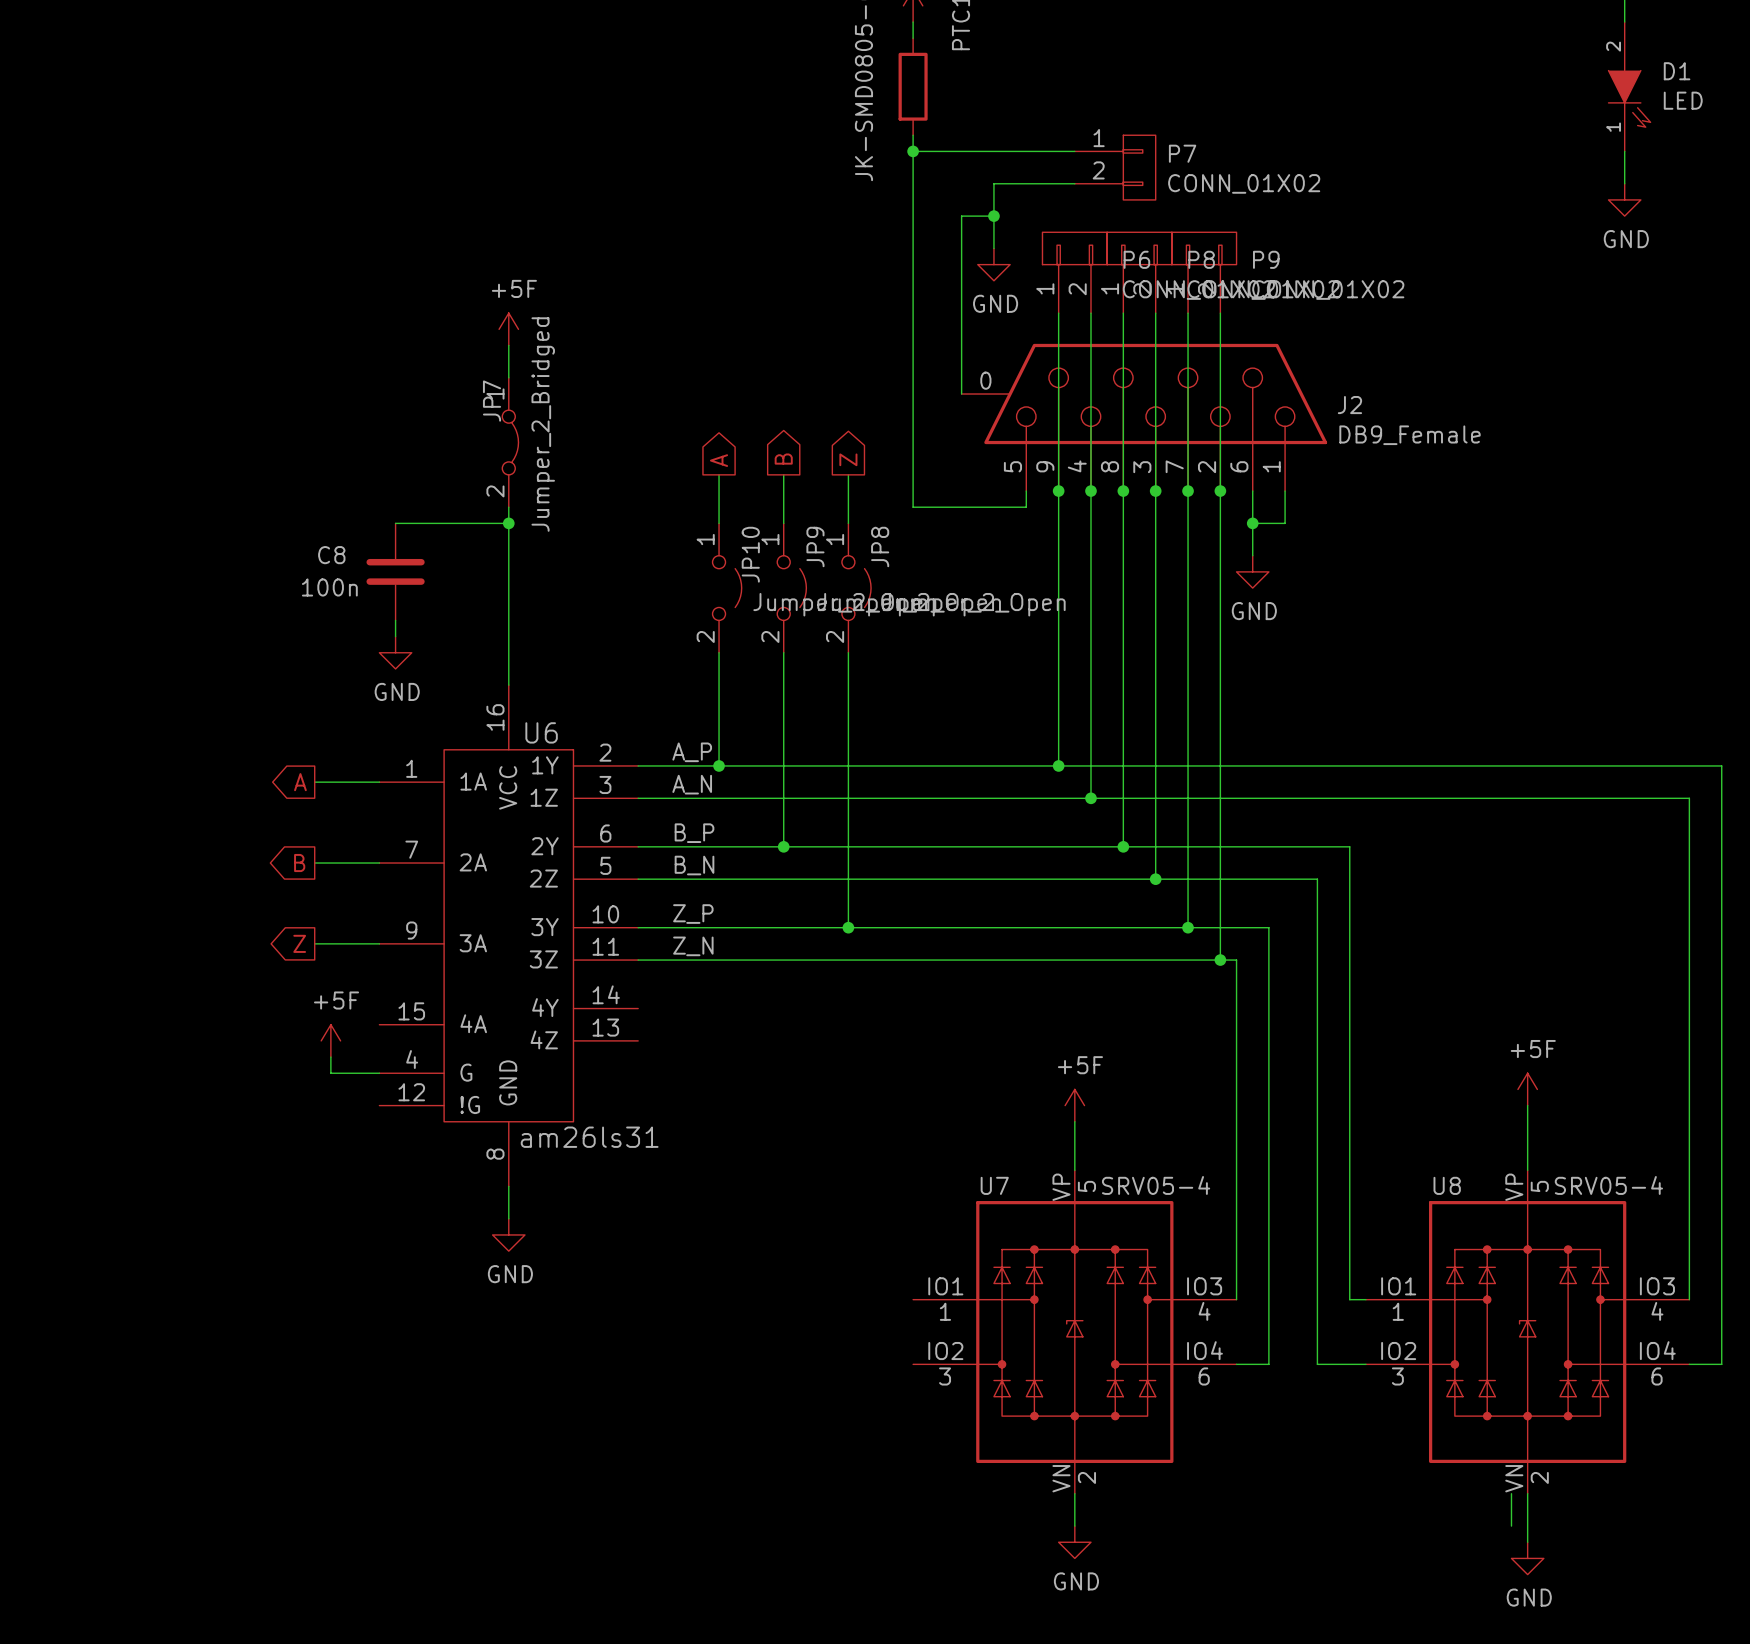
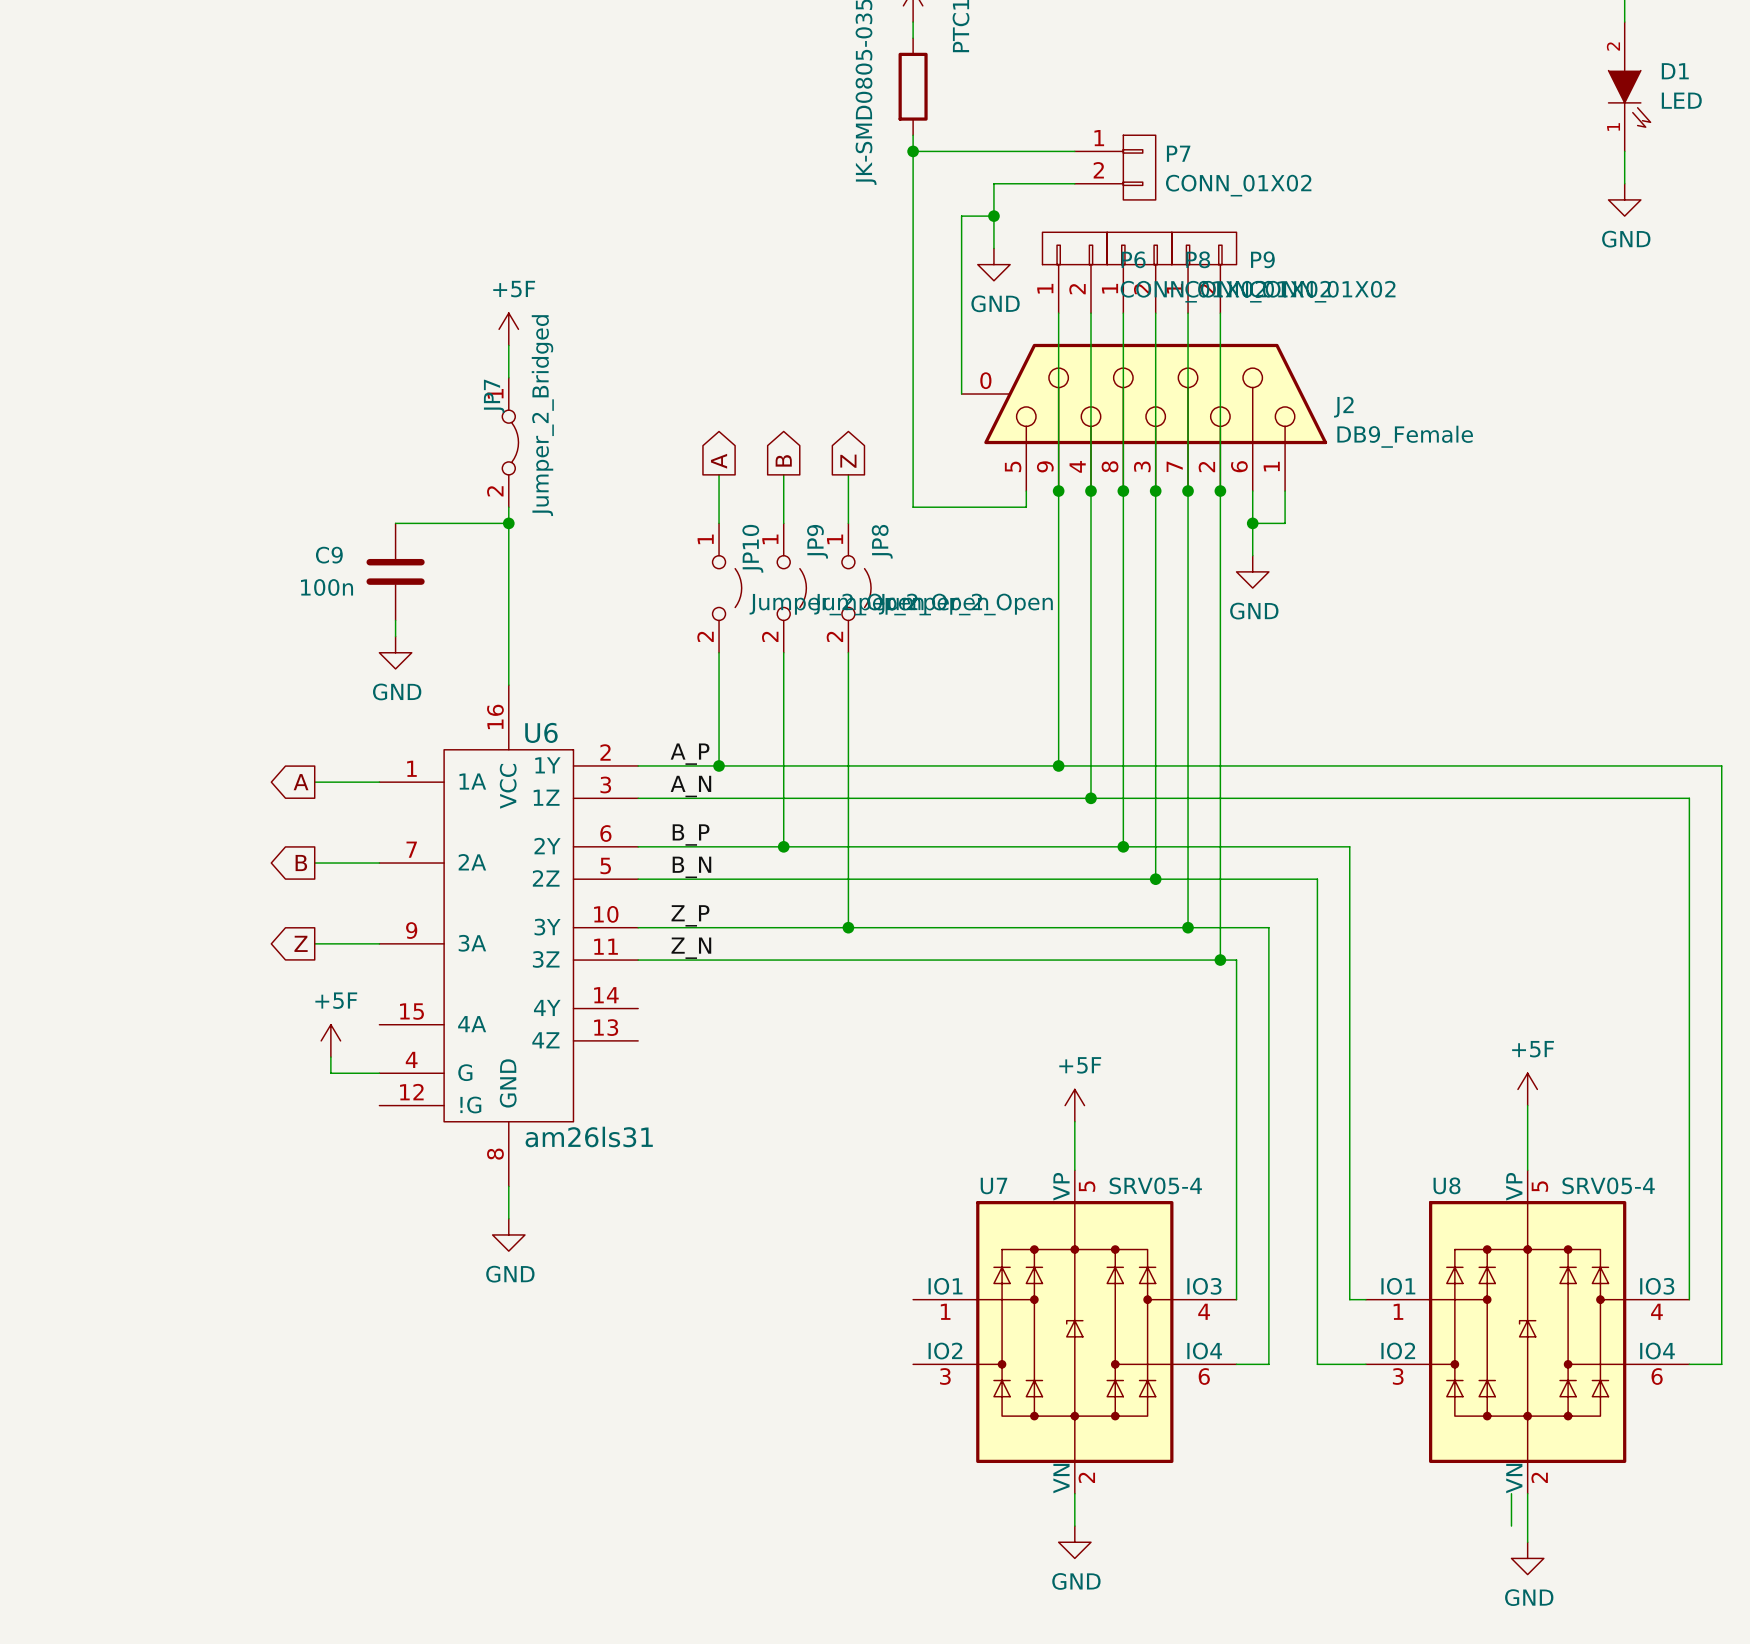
C8 name: C8 (331, 555) -> C9 (329, 555)

